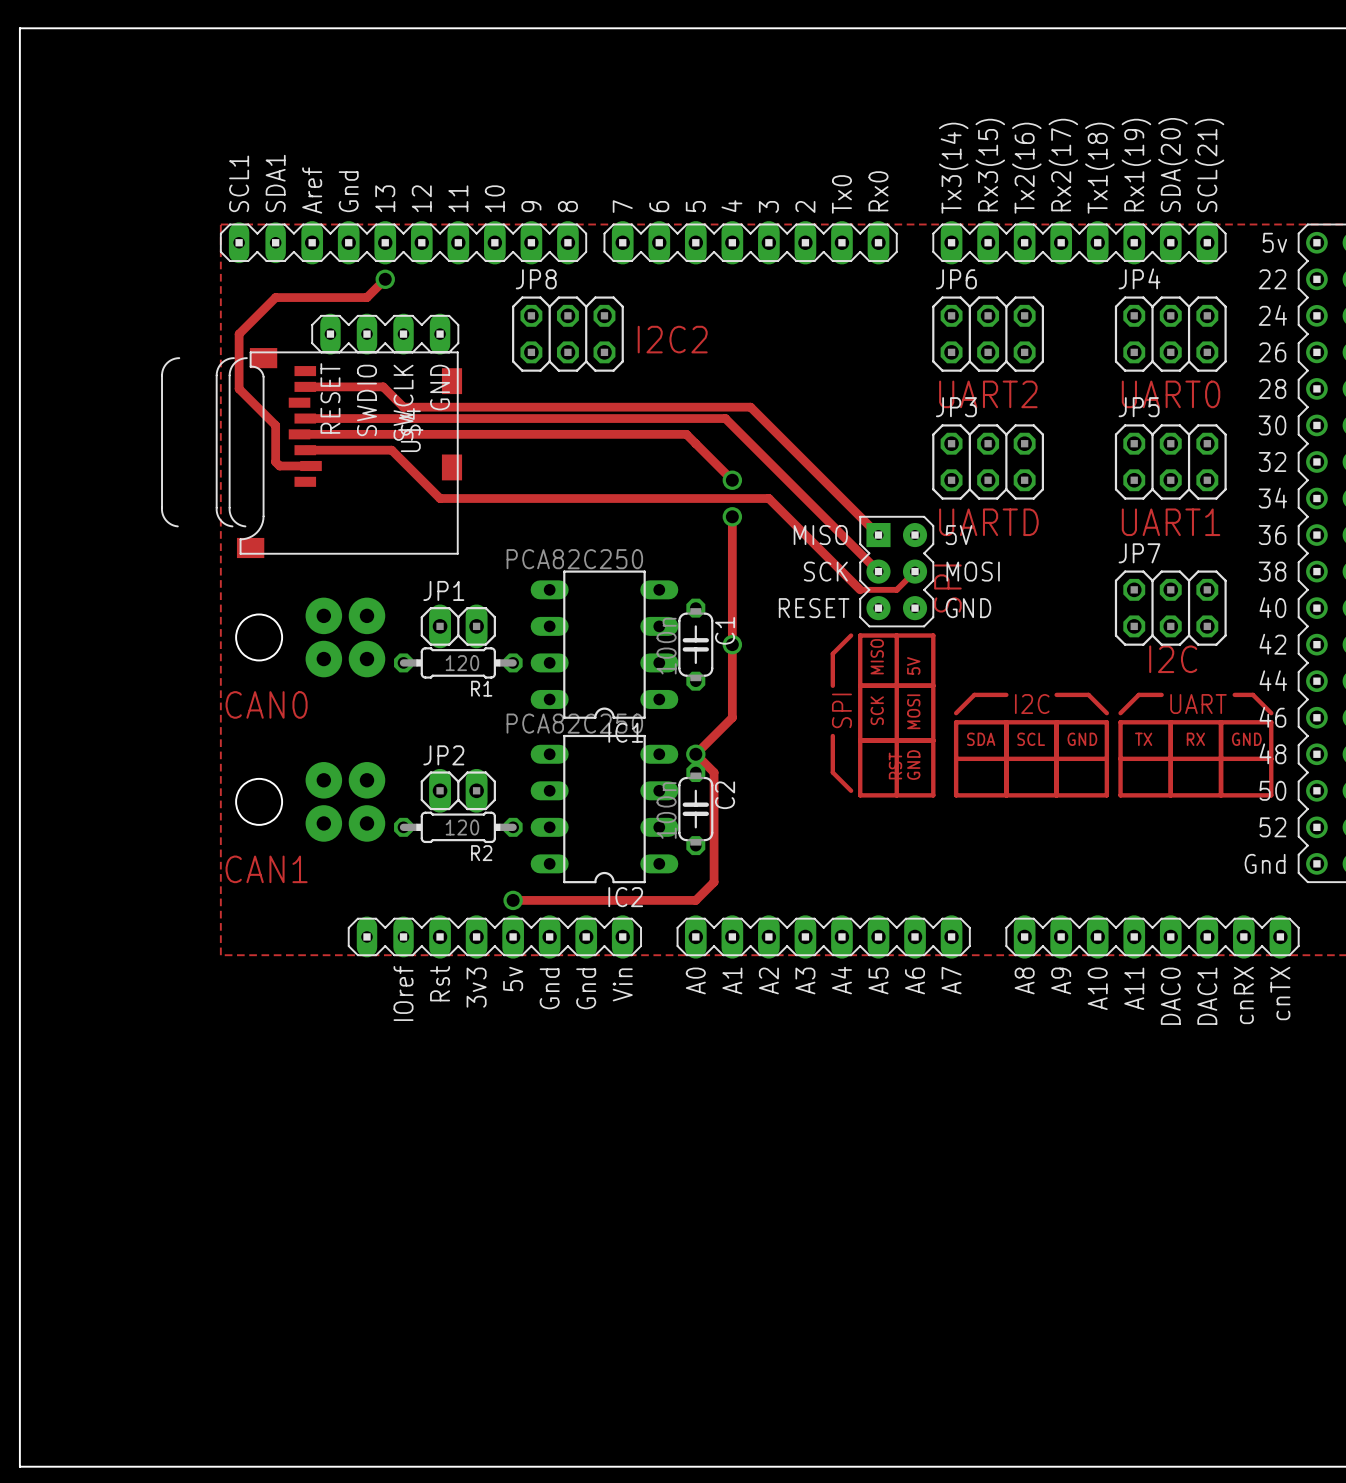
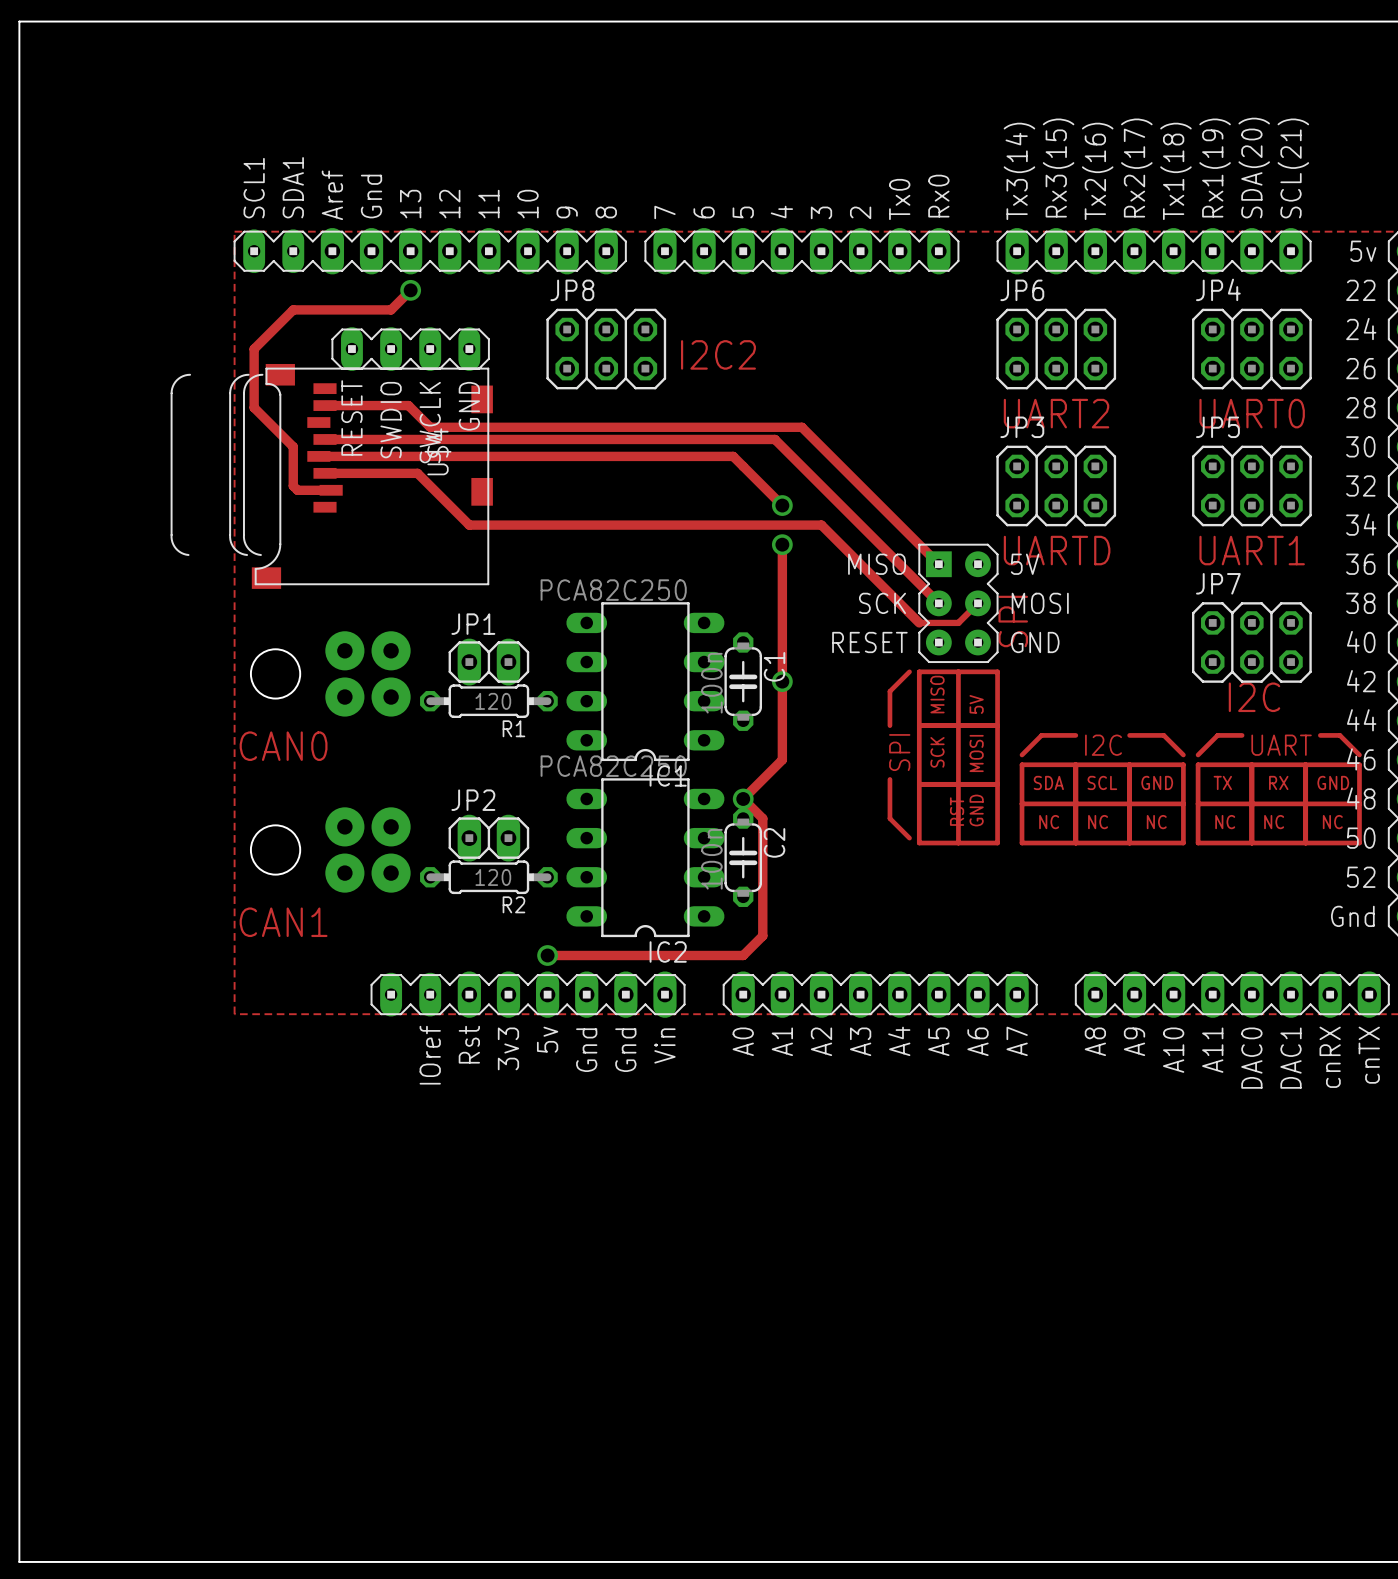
text: none -> NC (1049, 822)
text: none -> NC (1098, 822)
text: none -> NC (1156, 822)
text: none -> NC (1225, 822)
text: none -> NC (1274, 822)
text: none -> NC (1332, 822)

